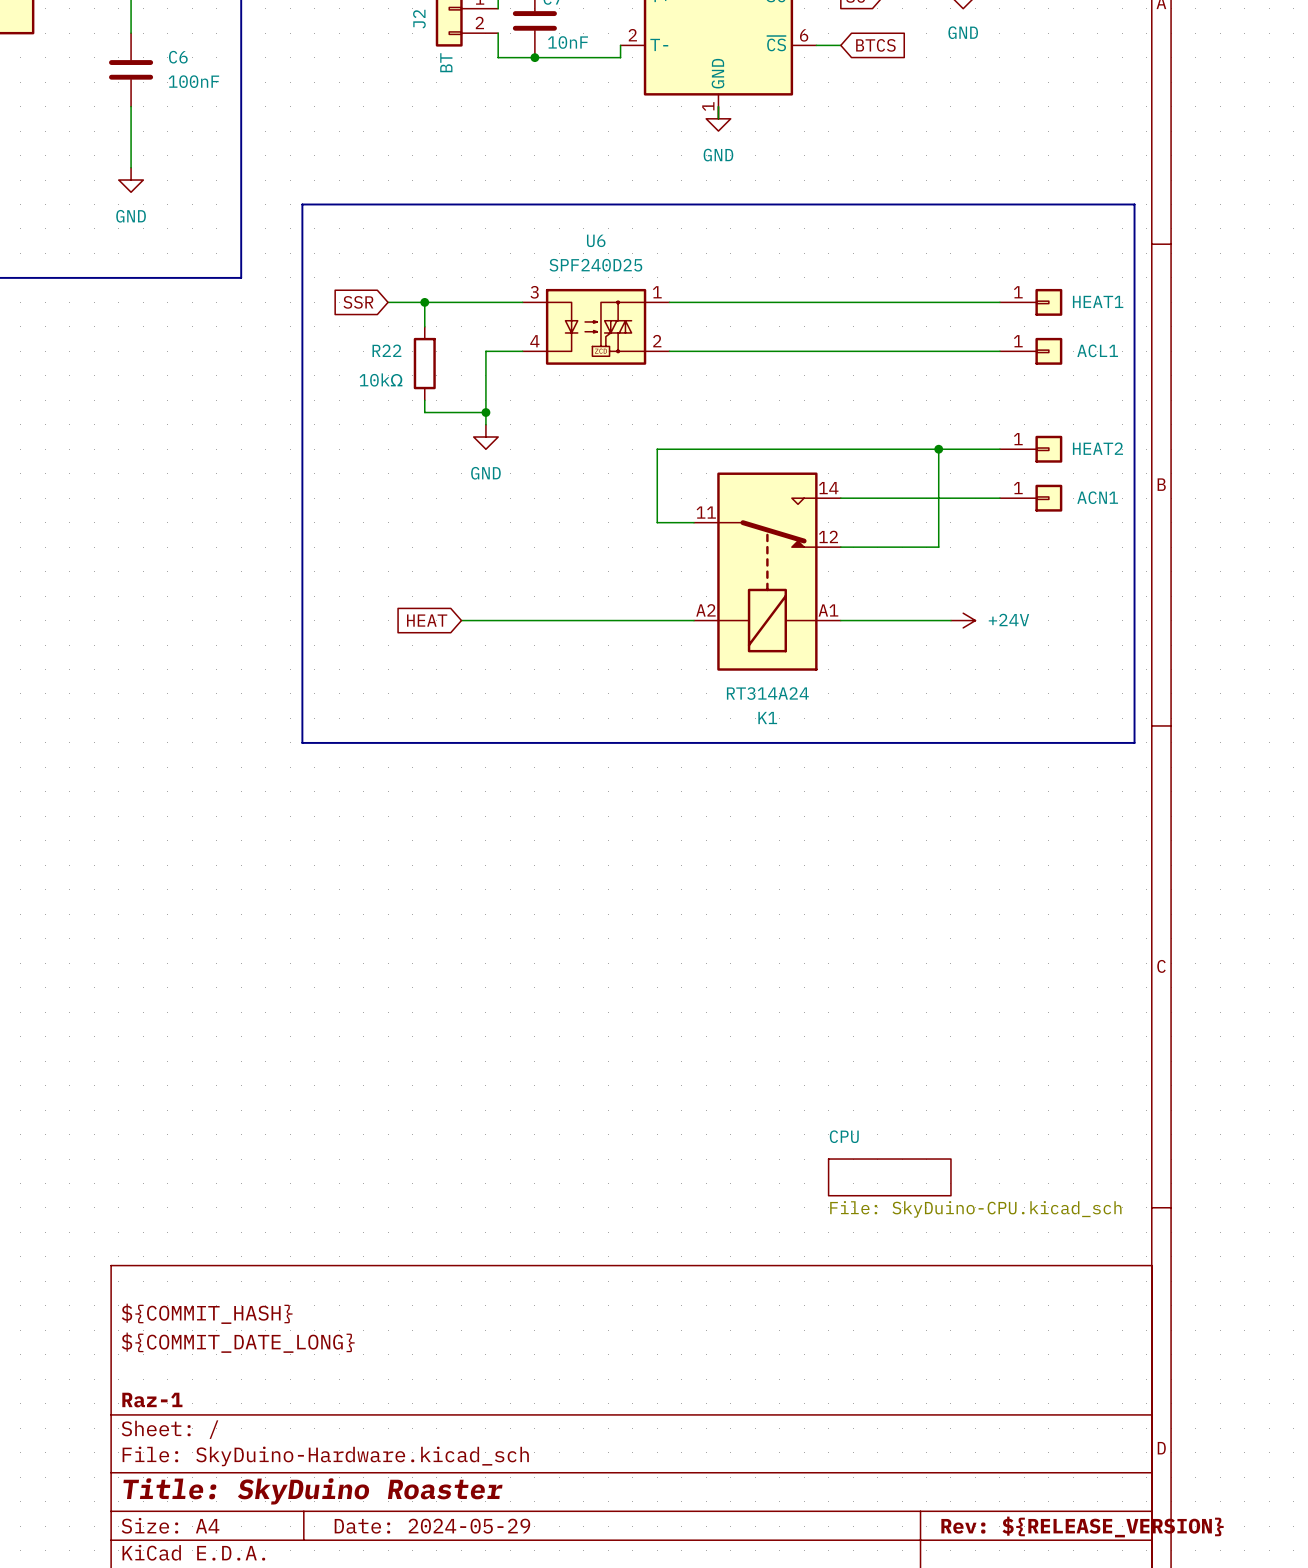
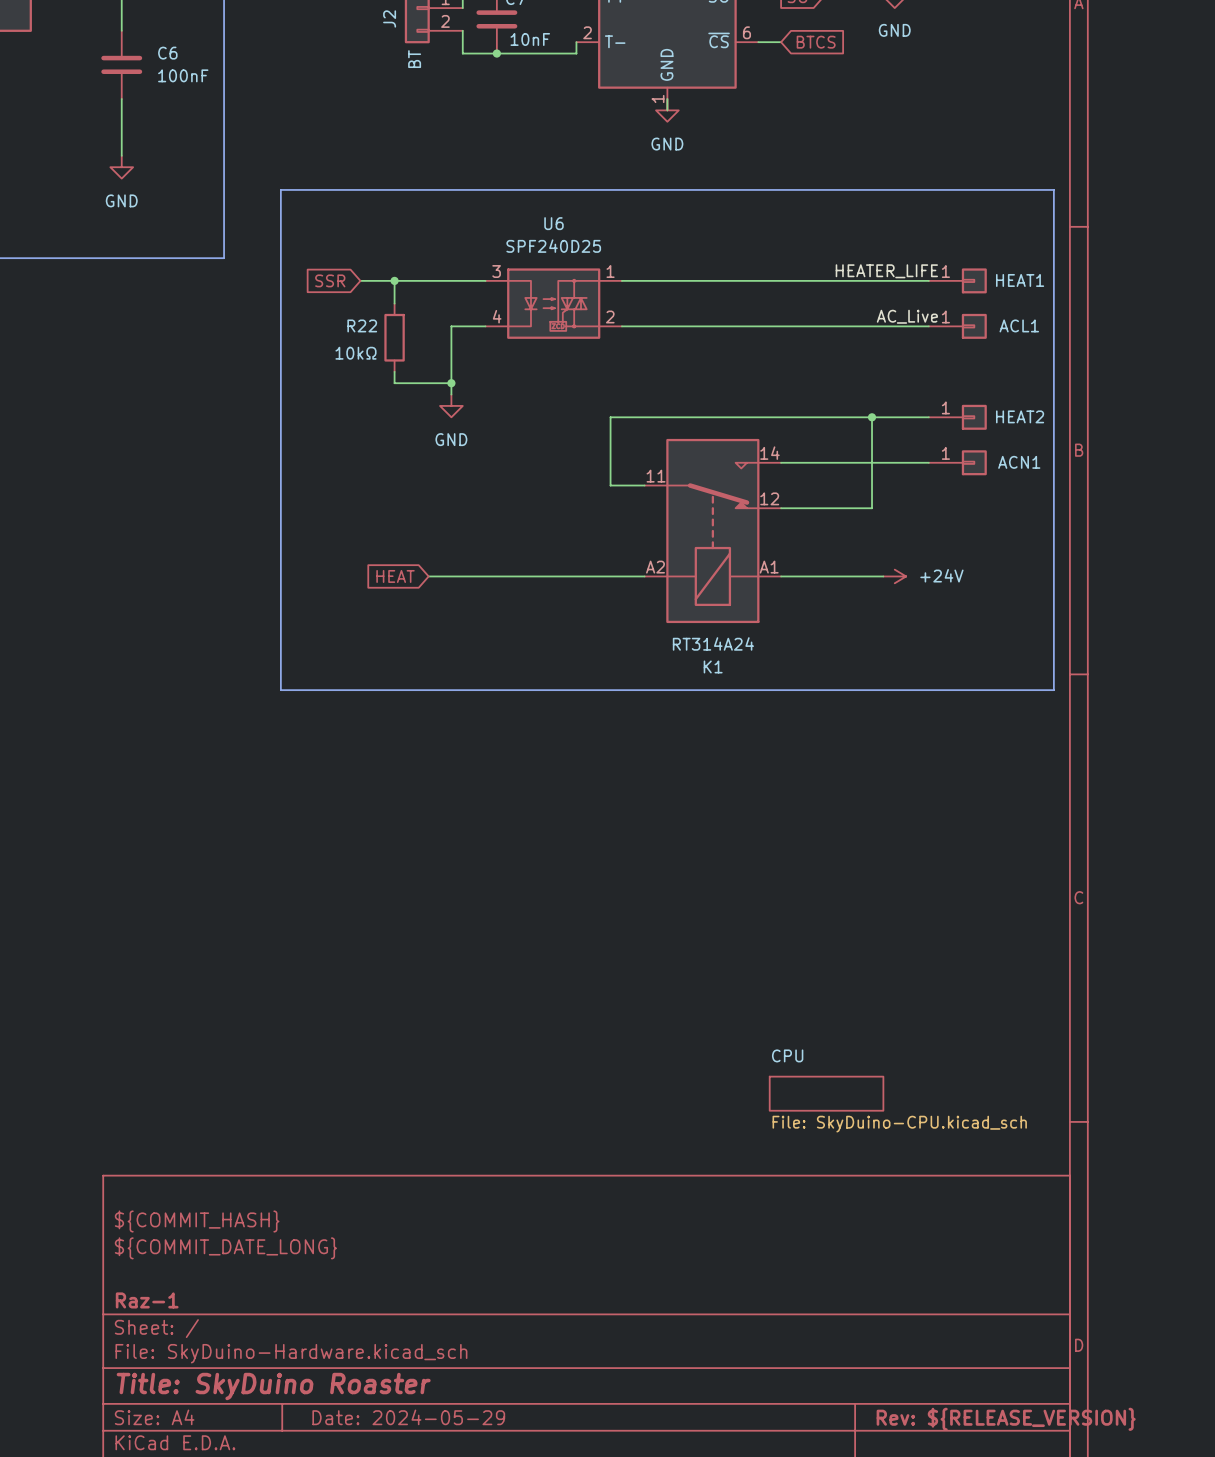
label: none -> HEATER_LIFE (886, 271)
label: none -> AC_Live (907, 316)

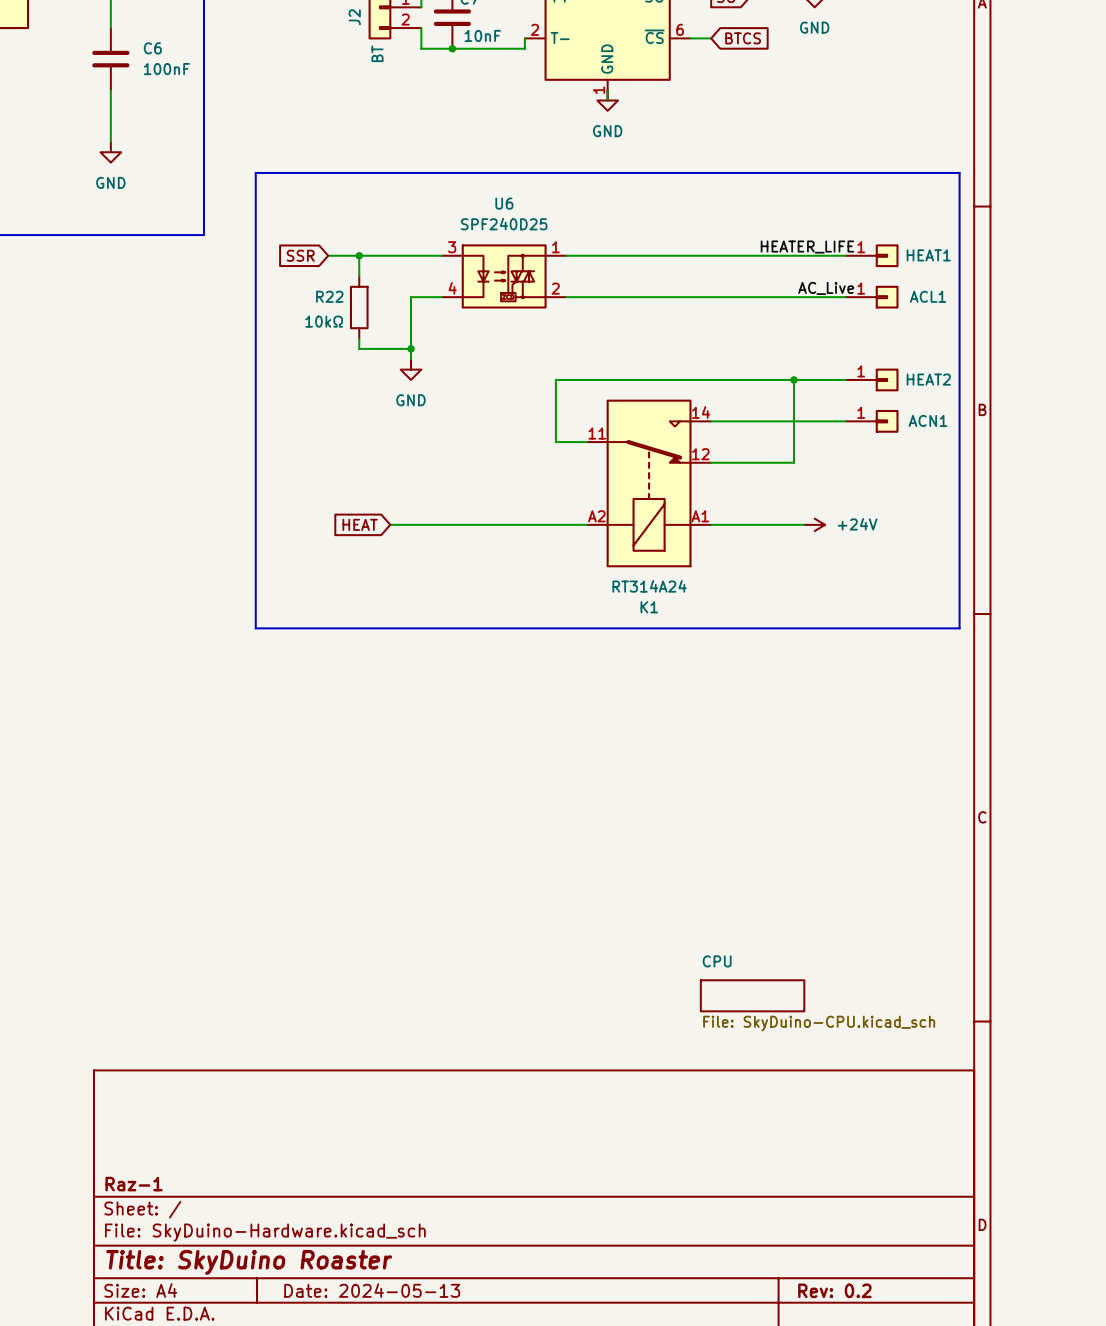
title block: ${COMMIT_HASH} (197, 1221) -> none
title block: ${COMMIT_DATE_LONG} (225, 1248) -> none
title block: Date: 2024-05-29 (408, 1417) -> Date: 2024-05-13 (372, 1290)
title block: Rev: ${RELEASE_VERSION} (1006, 1419) -> Rev: 0.2 (834, 1290)

